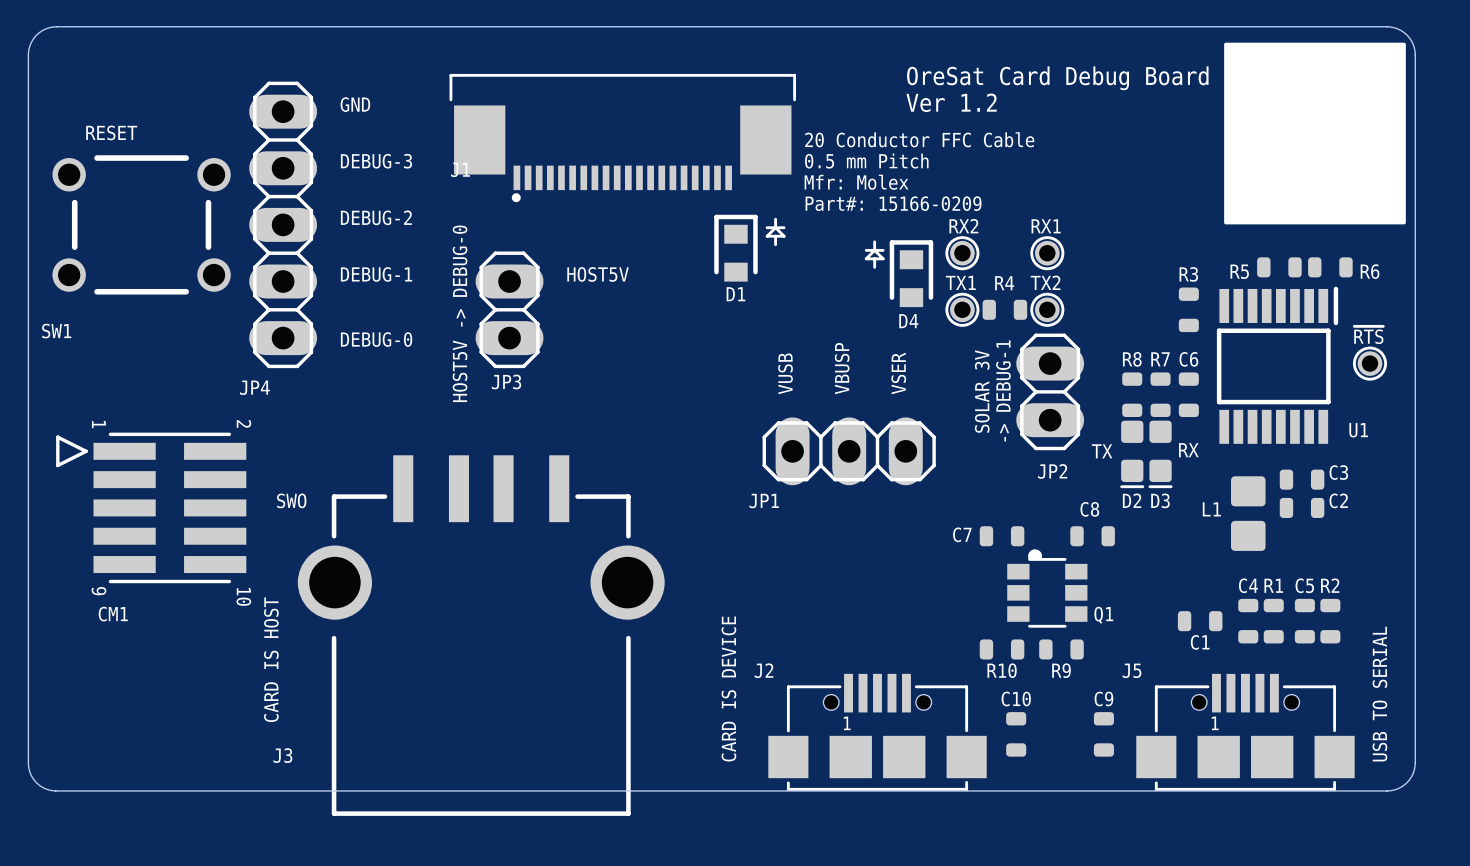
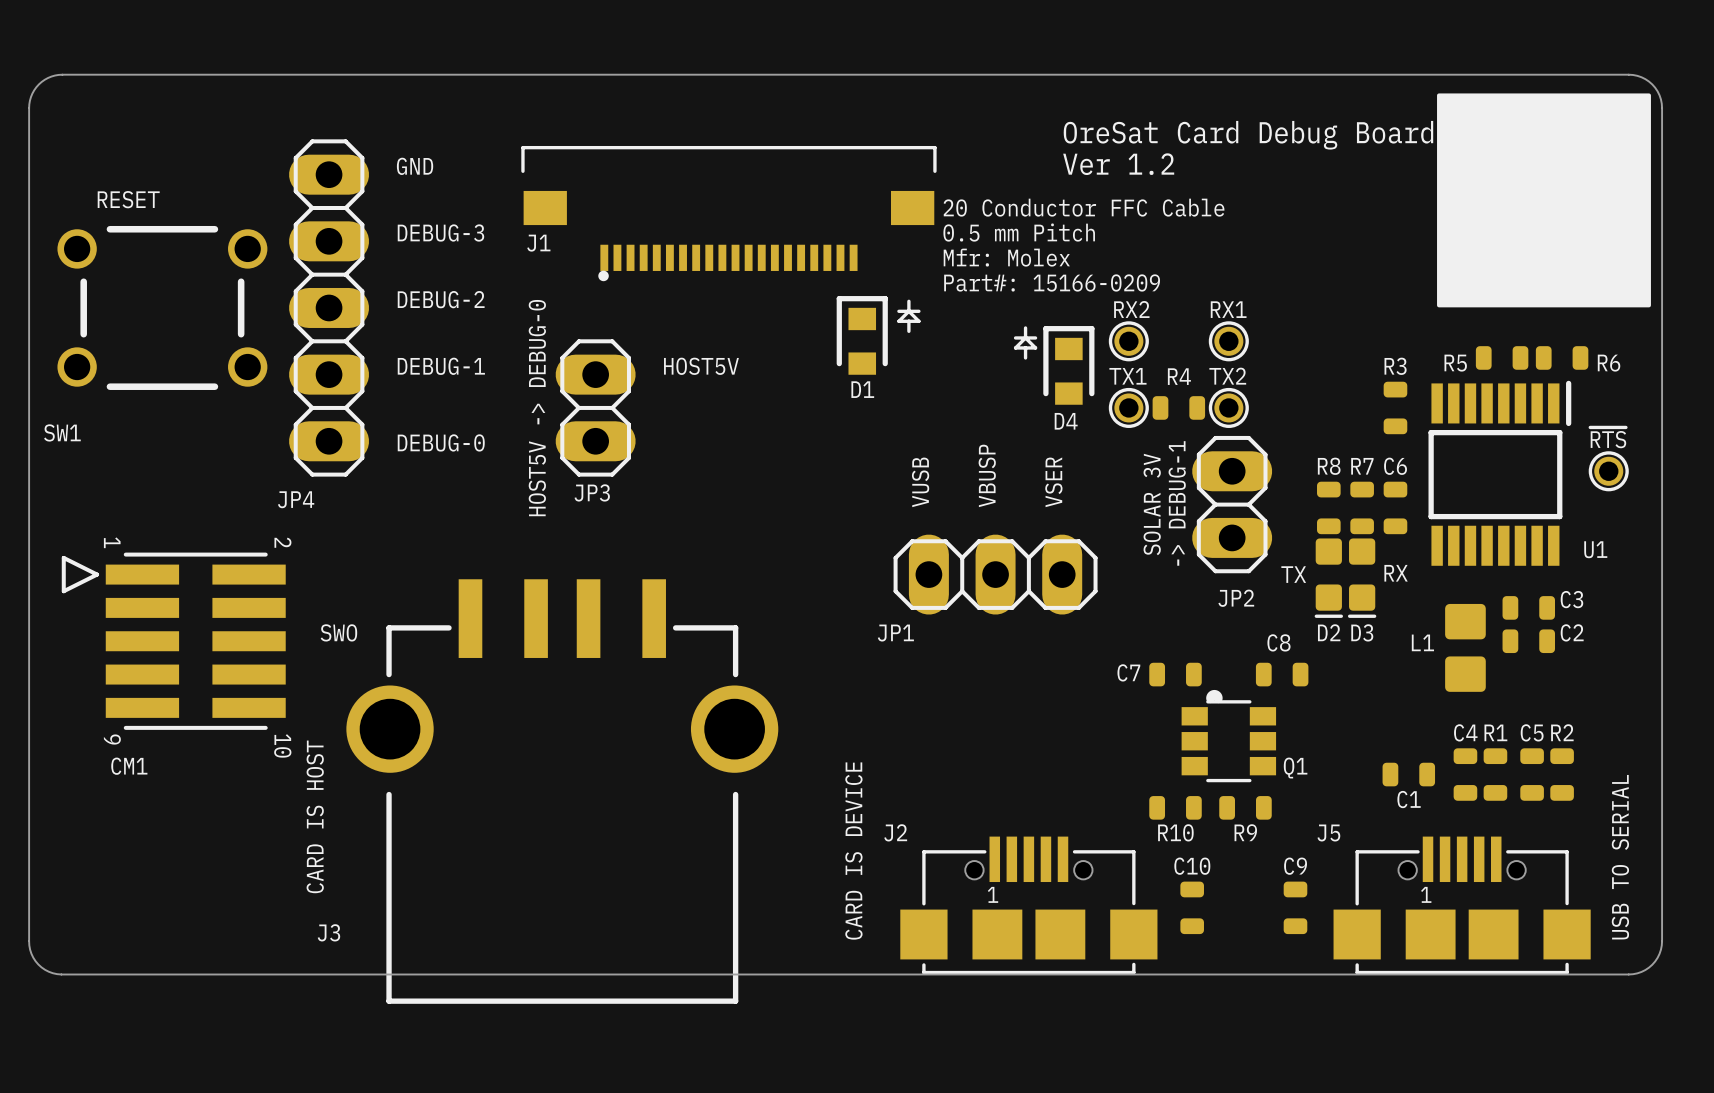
J1 footprint: [449, 73, 797, 203] -> [521, 145, 937, 282]

